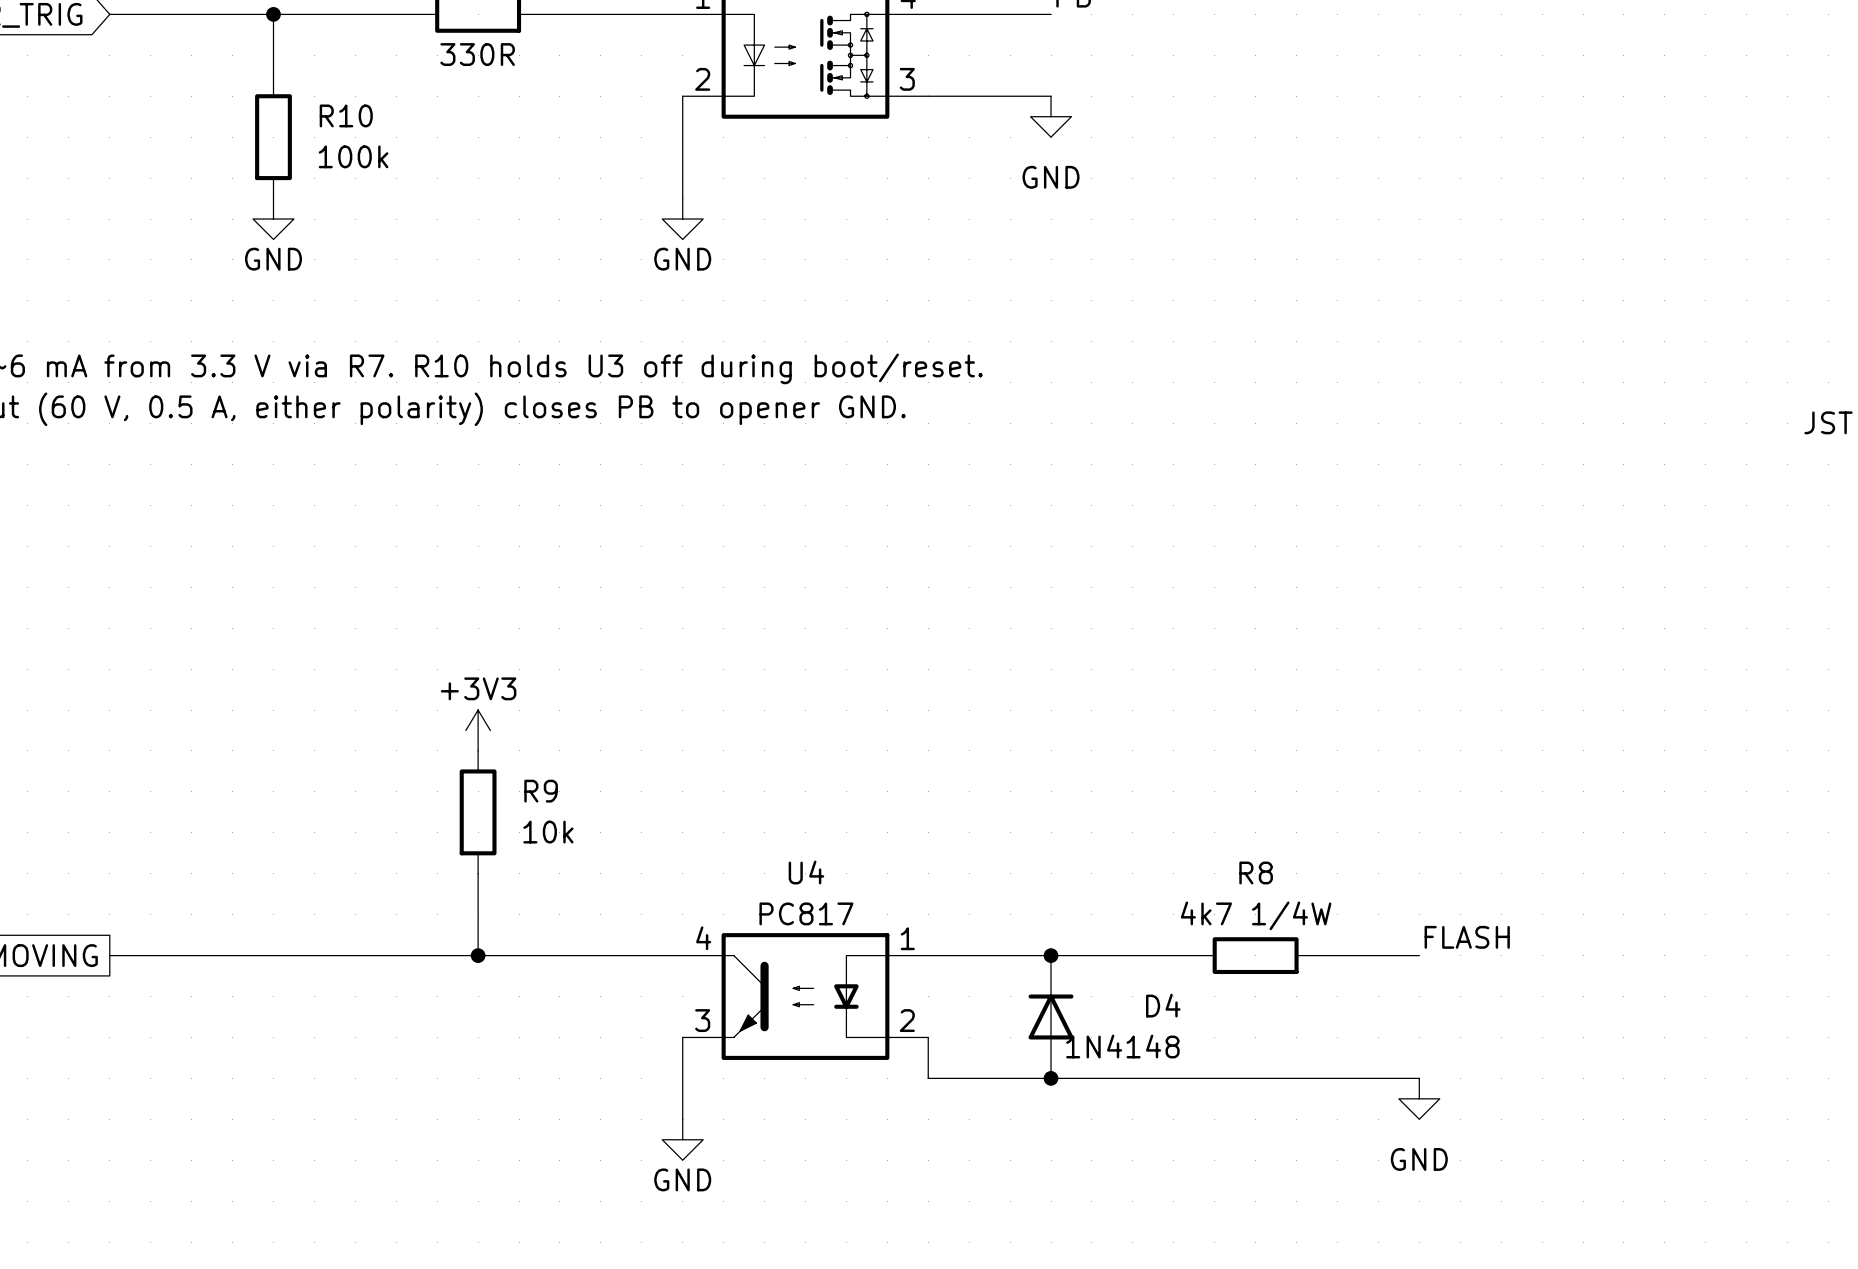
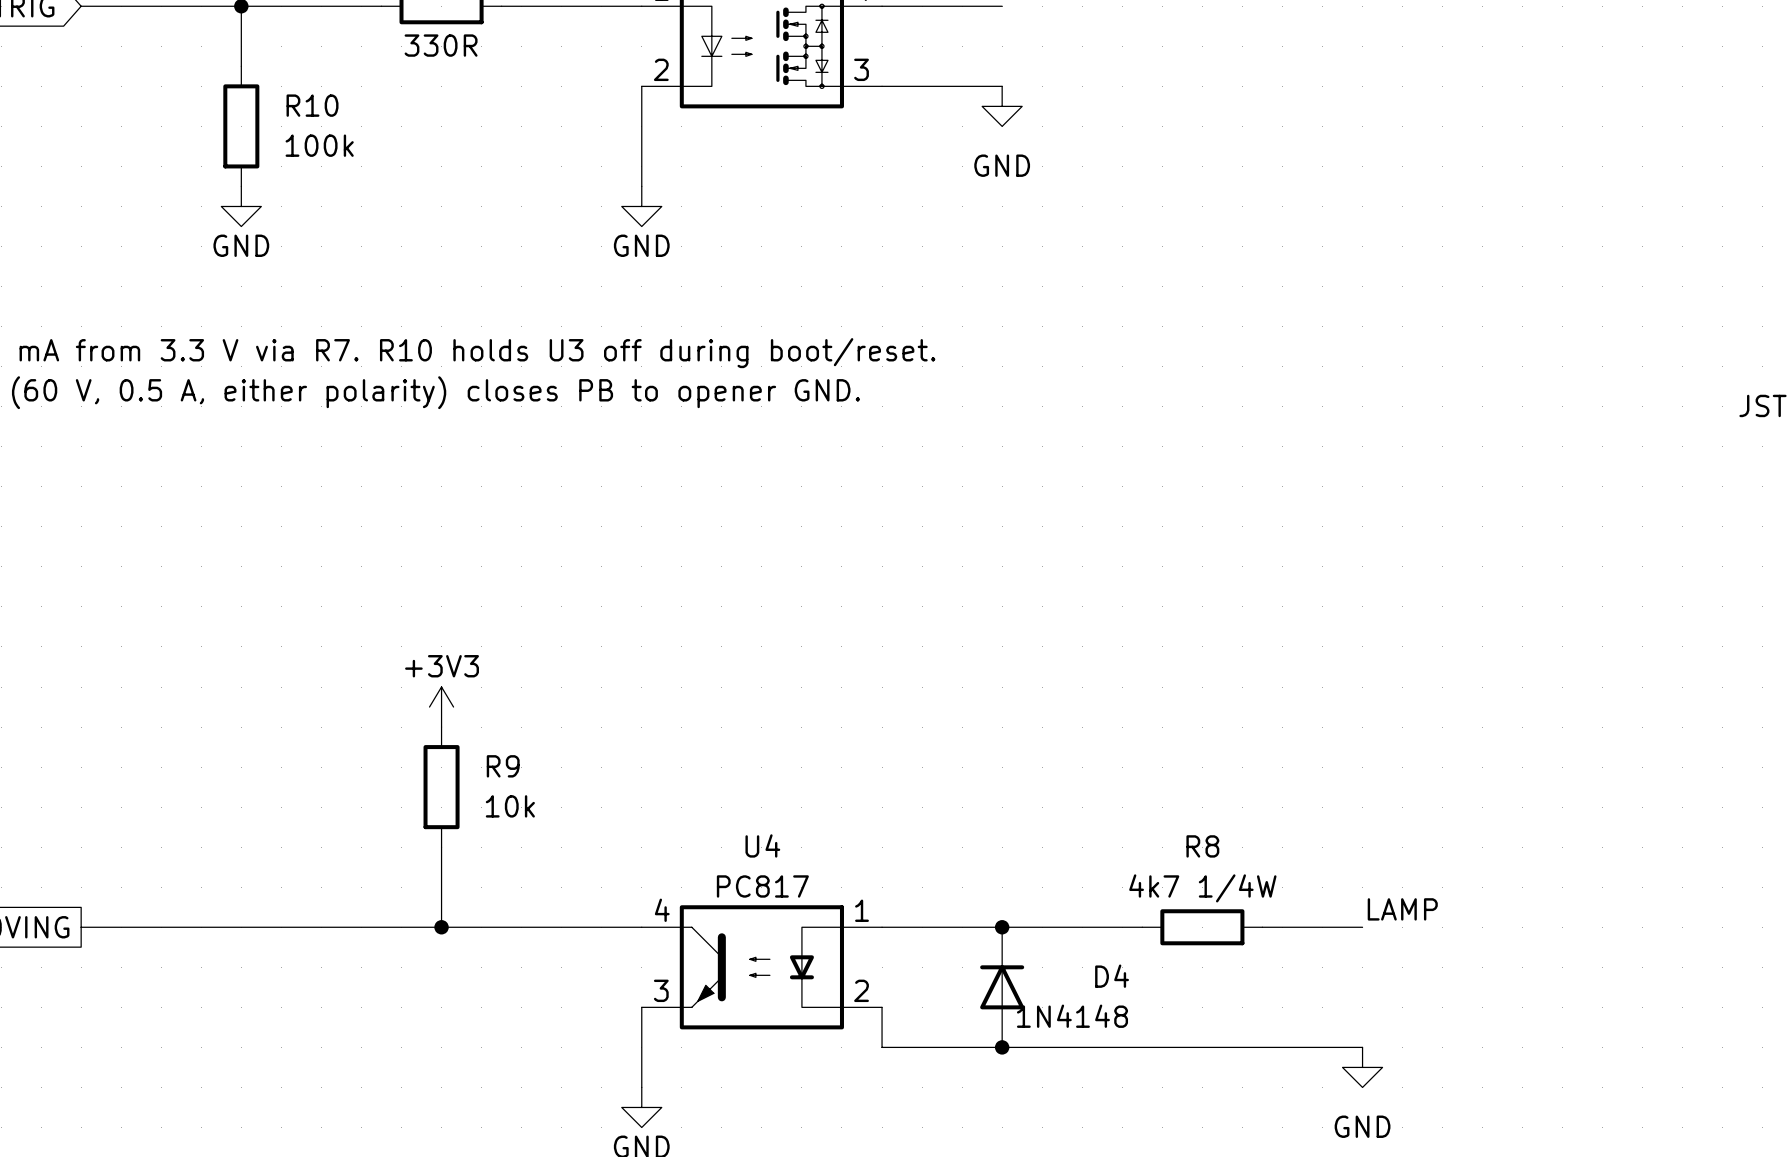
label: FLASH (1467, 937) -> LAMP (1402, 909)

